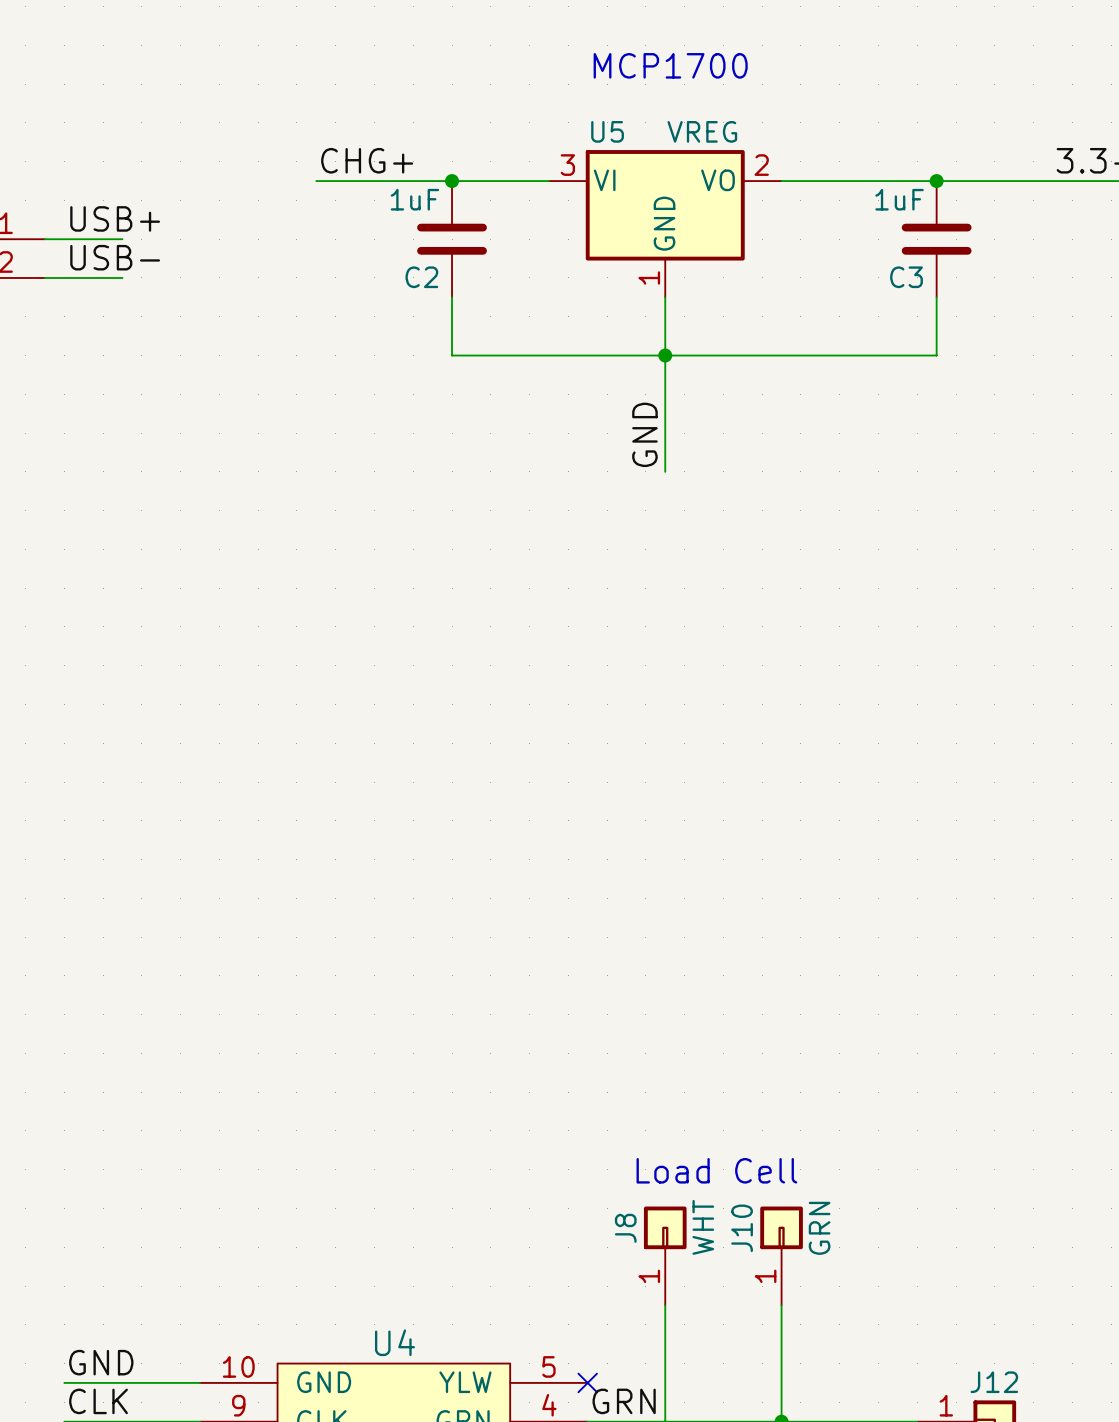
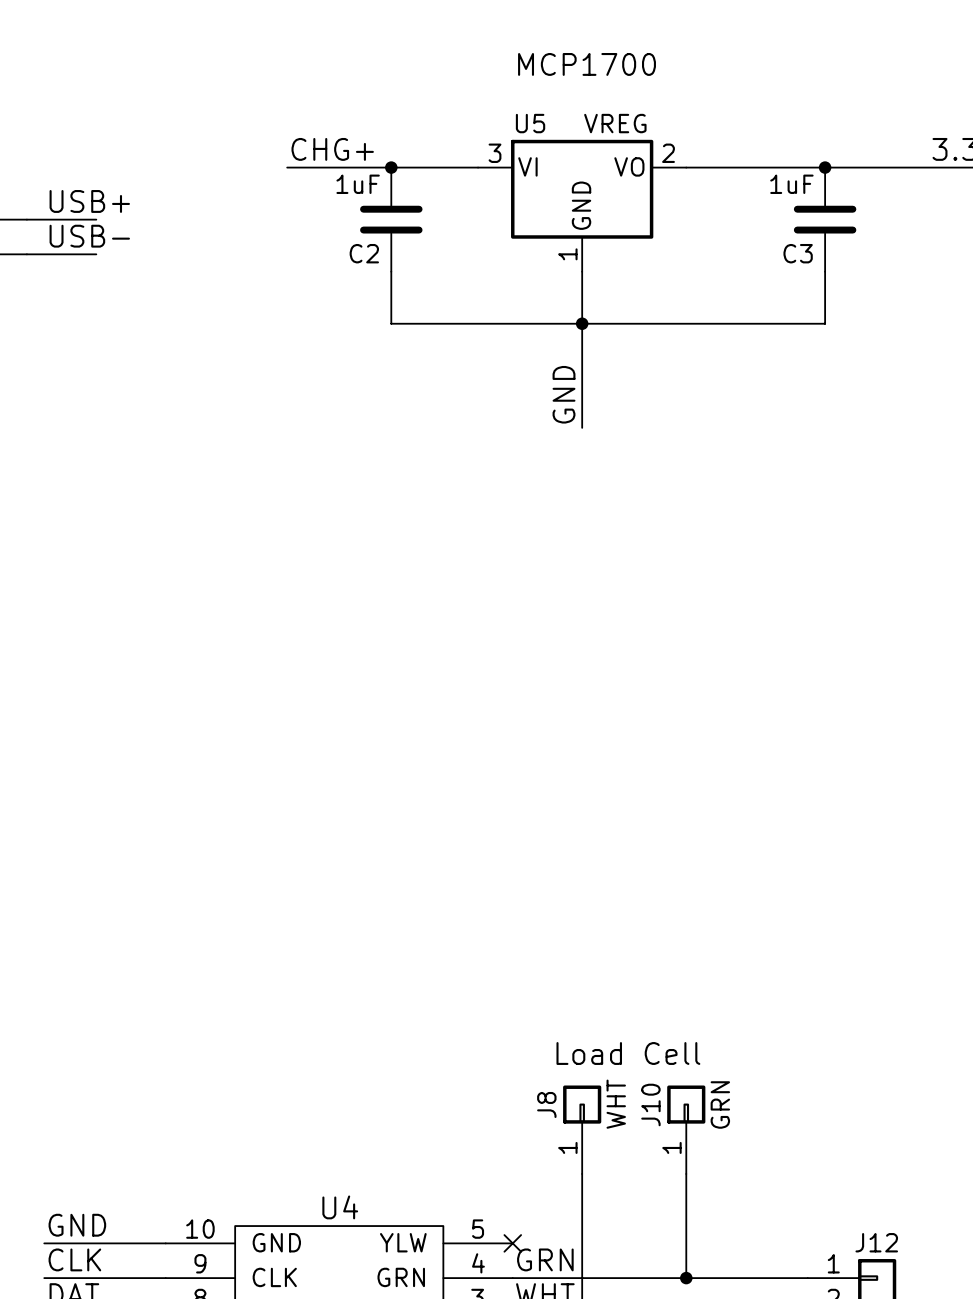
label position: CHG+ (367, 160) -> CHG+ (332, 149)
wire: (316, 181) (335, 181) -> none

